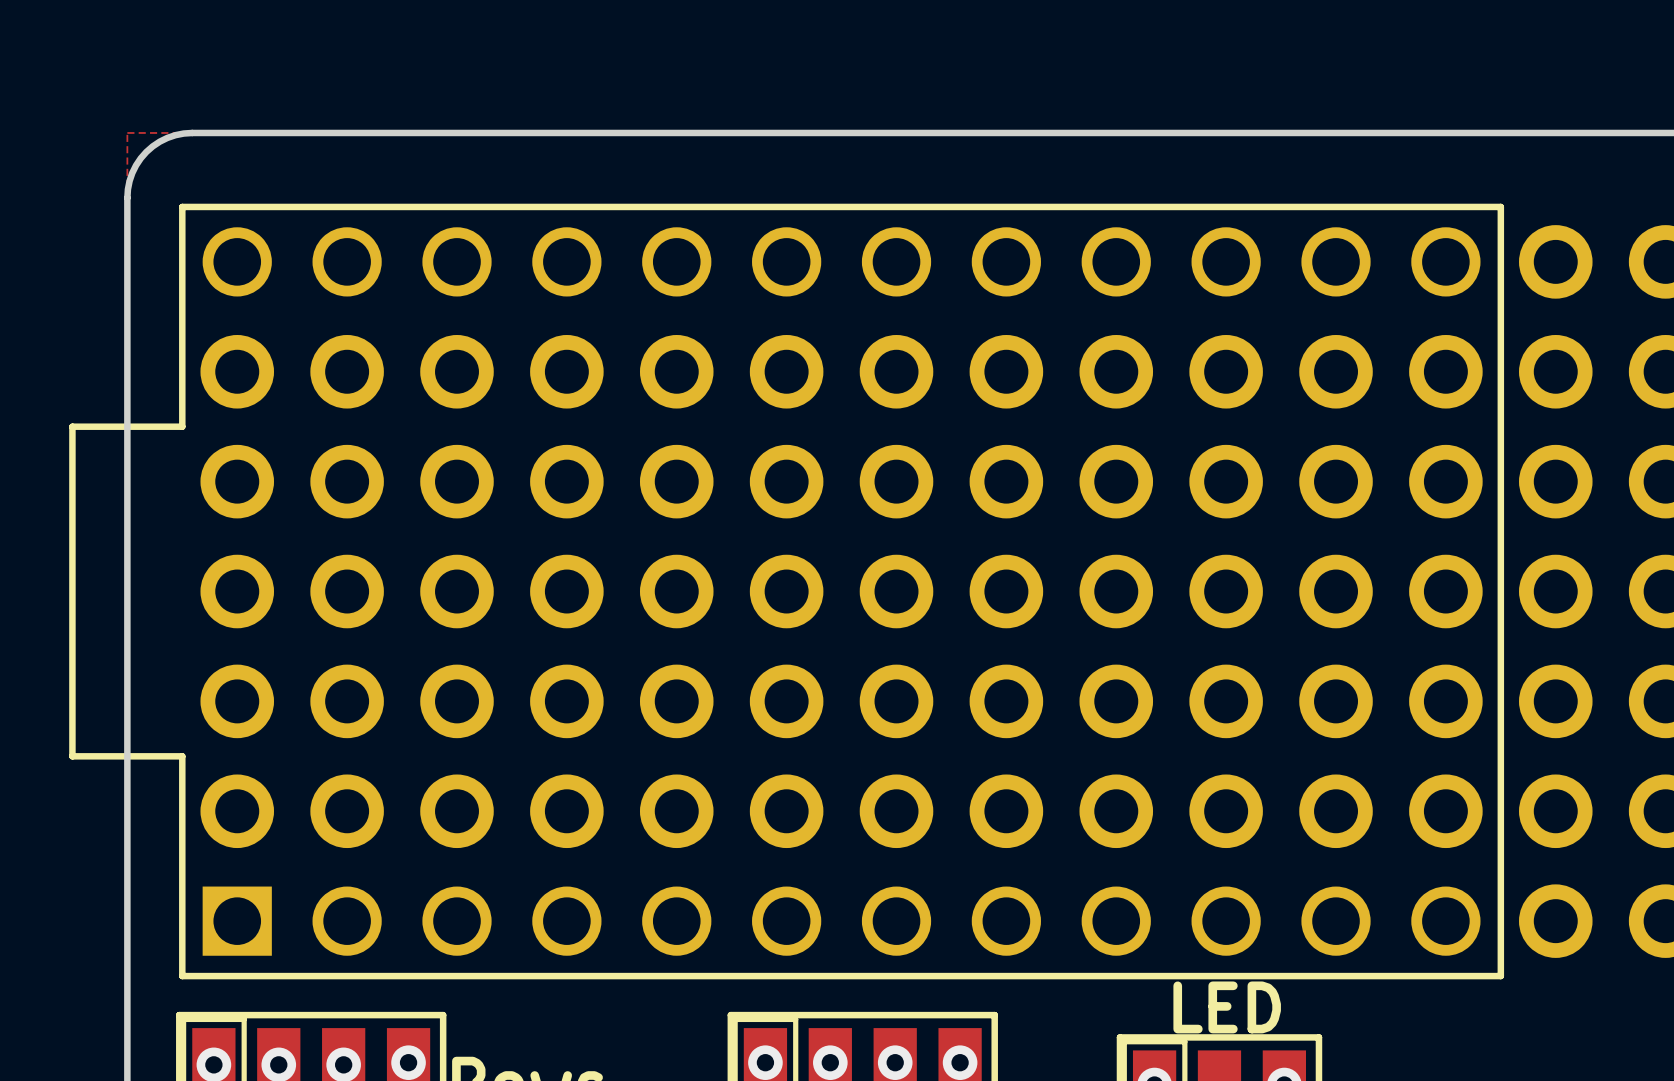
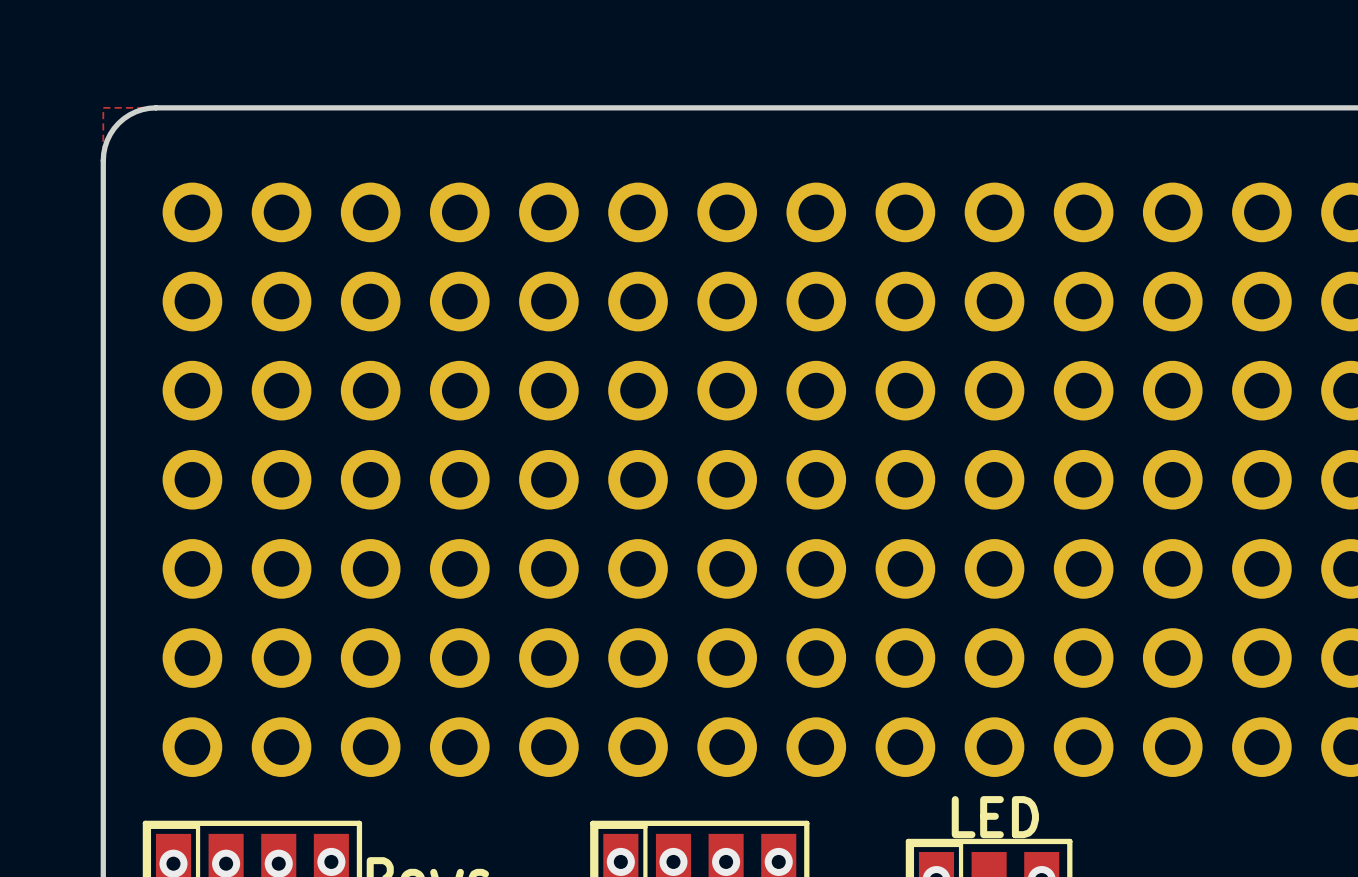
part: none -> (192, 212)
part: none -> (281, 212)
part: none -> (370, 212)
part: none -> (459, 212)
part: none -> (548, 212)
part: none -> (638, 212)
part: none -> (727, 212)
part: none -> (816, 212)
part: none -> (905, 212)
part: none -> (994, 212)
part: none -> (1083, 212)
part: none -> (1172, 212)
part: (786, 591) -> none
part: none -> (192, 747)
part: none -> (281, 747)
part: none -> (370, 747)
part: none -> (459, 747)
part: none -> (548, 747)
part: none -> (638, 747)
part: none -> (727, 747)
part: none -> (816, 747)
part: none -> (905, 747)
part: none -> (994, 747)
part: none -> (1083, 747)
part: none -> (1172, 747)

